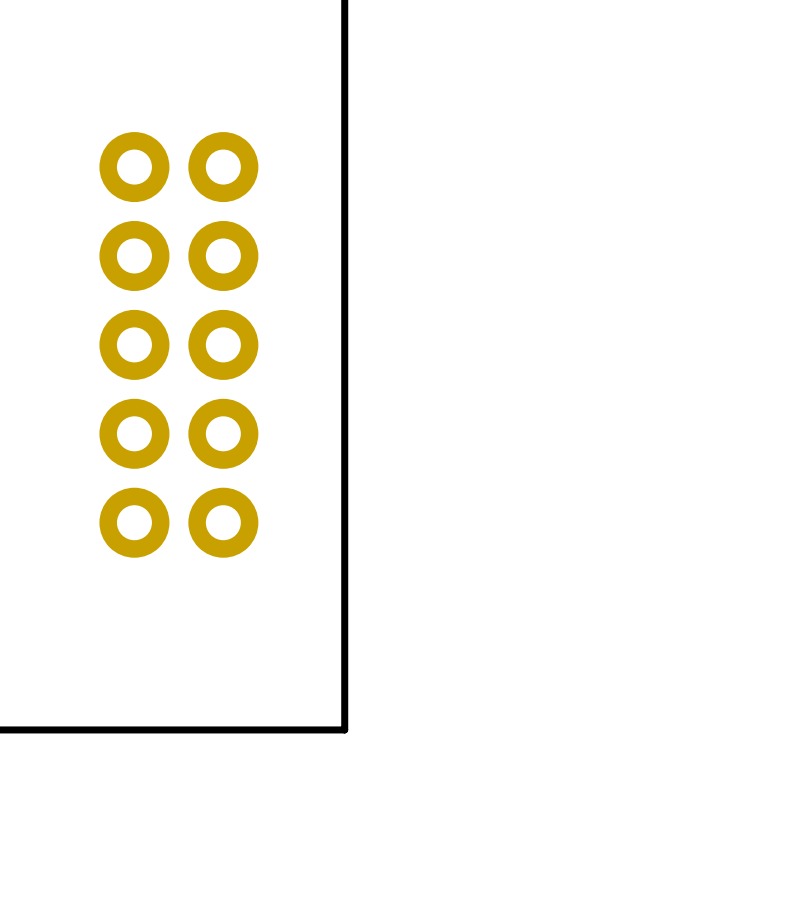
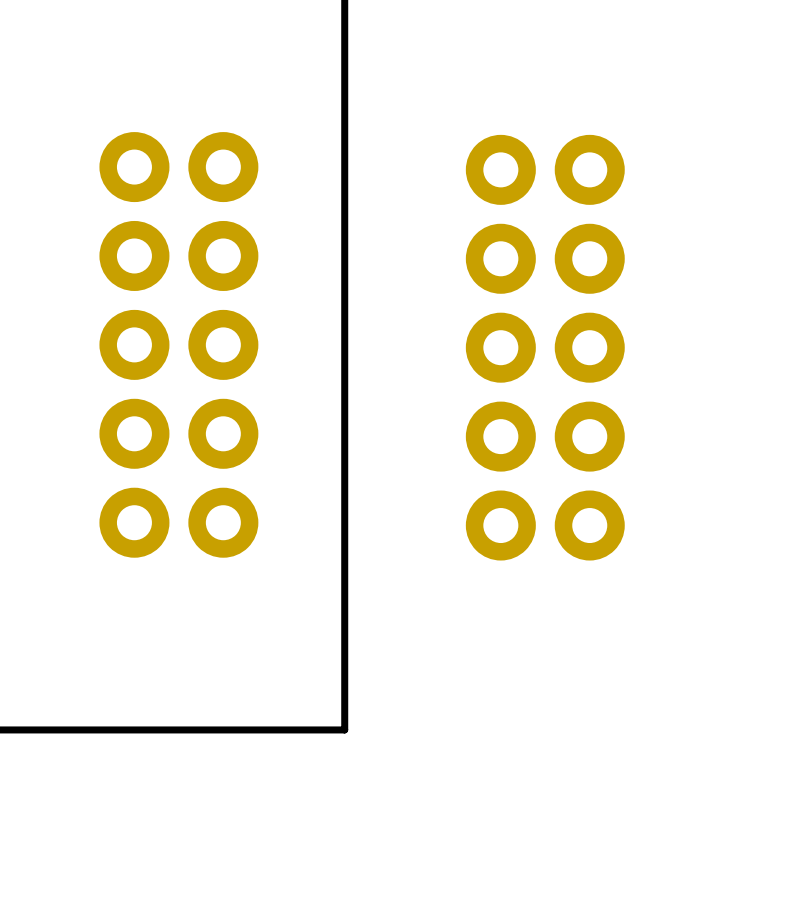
part: none -> (545, 347)

